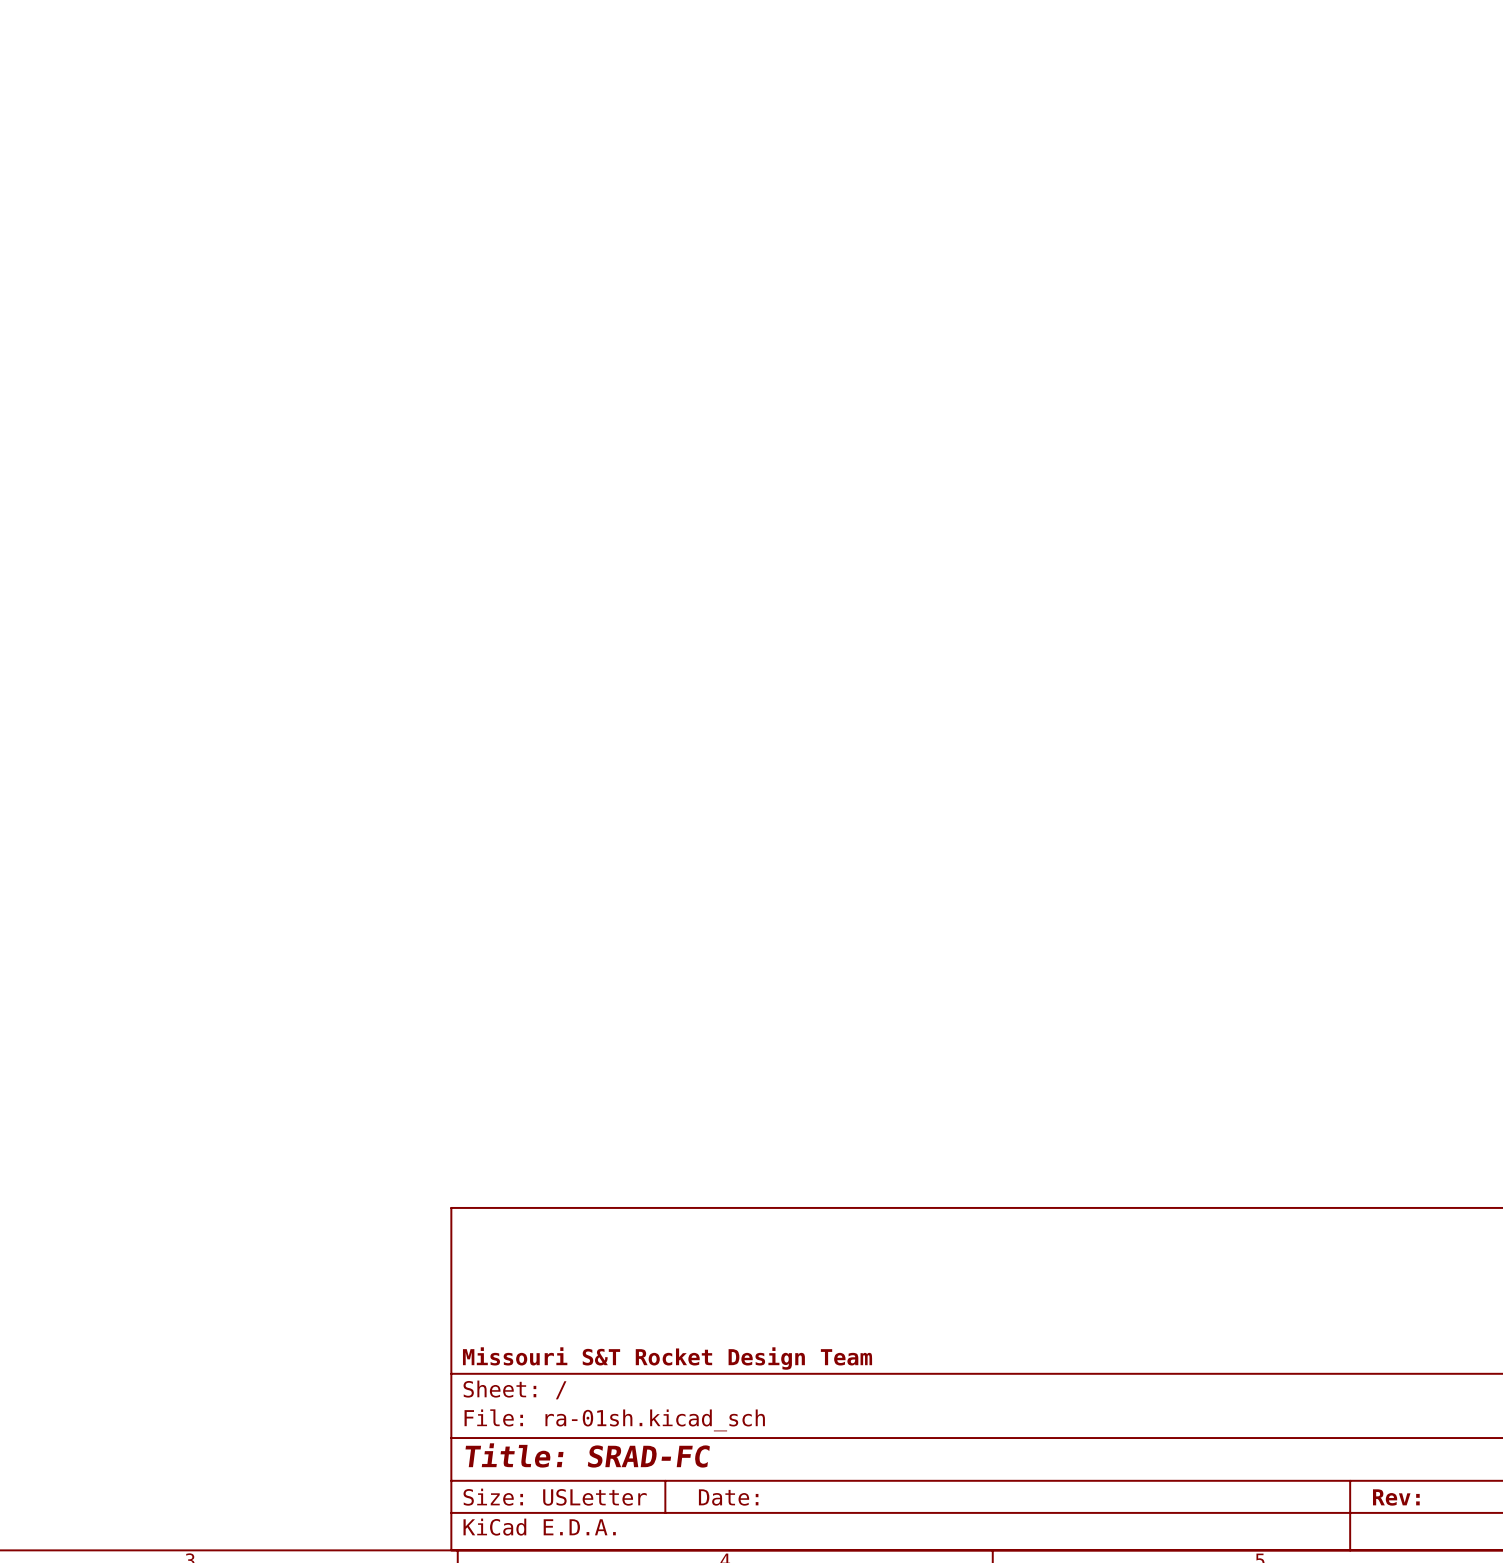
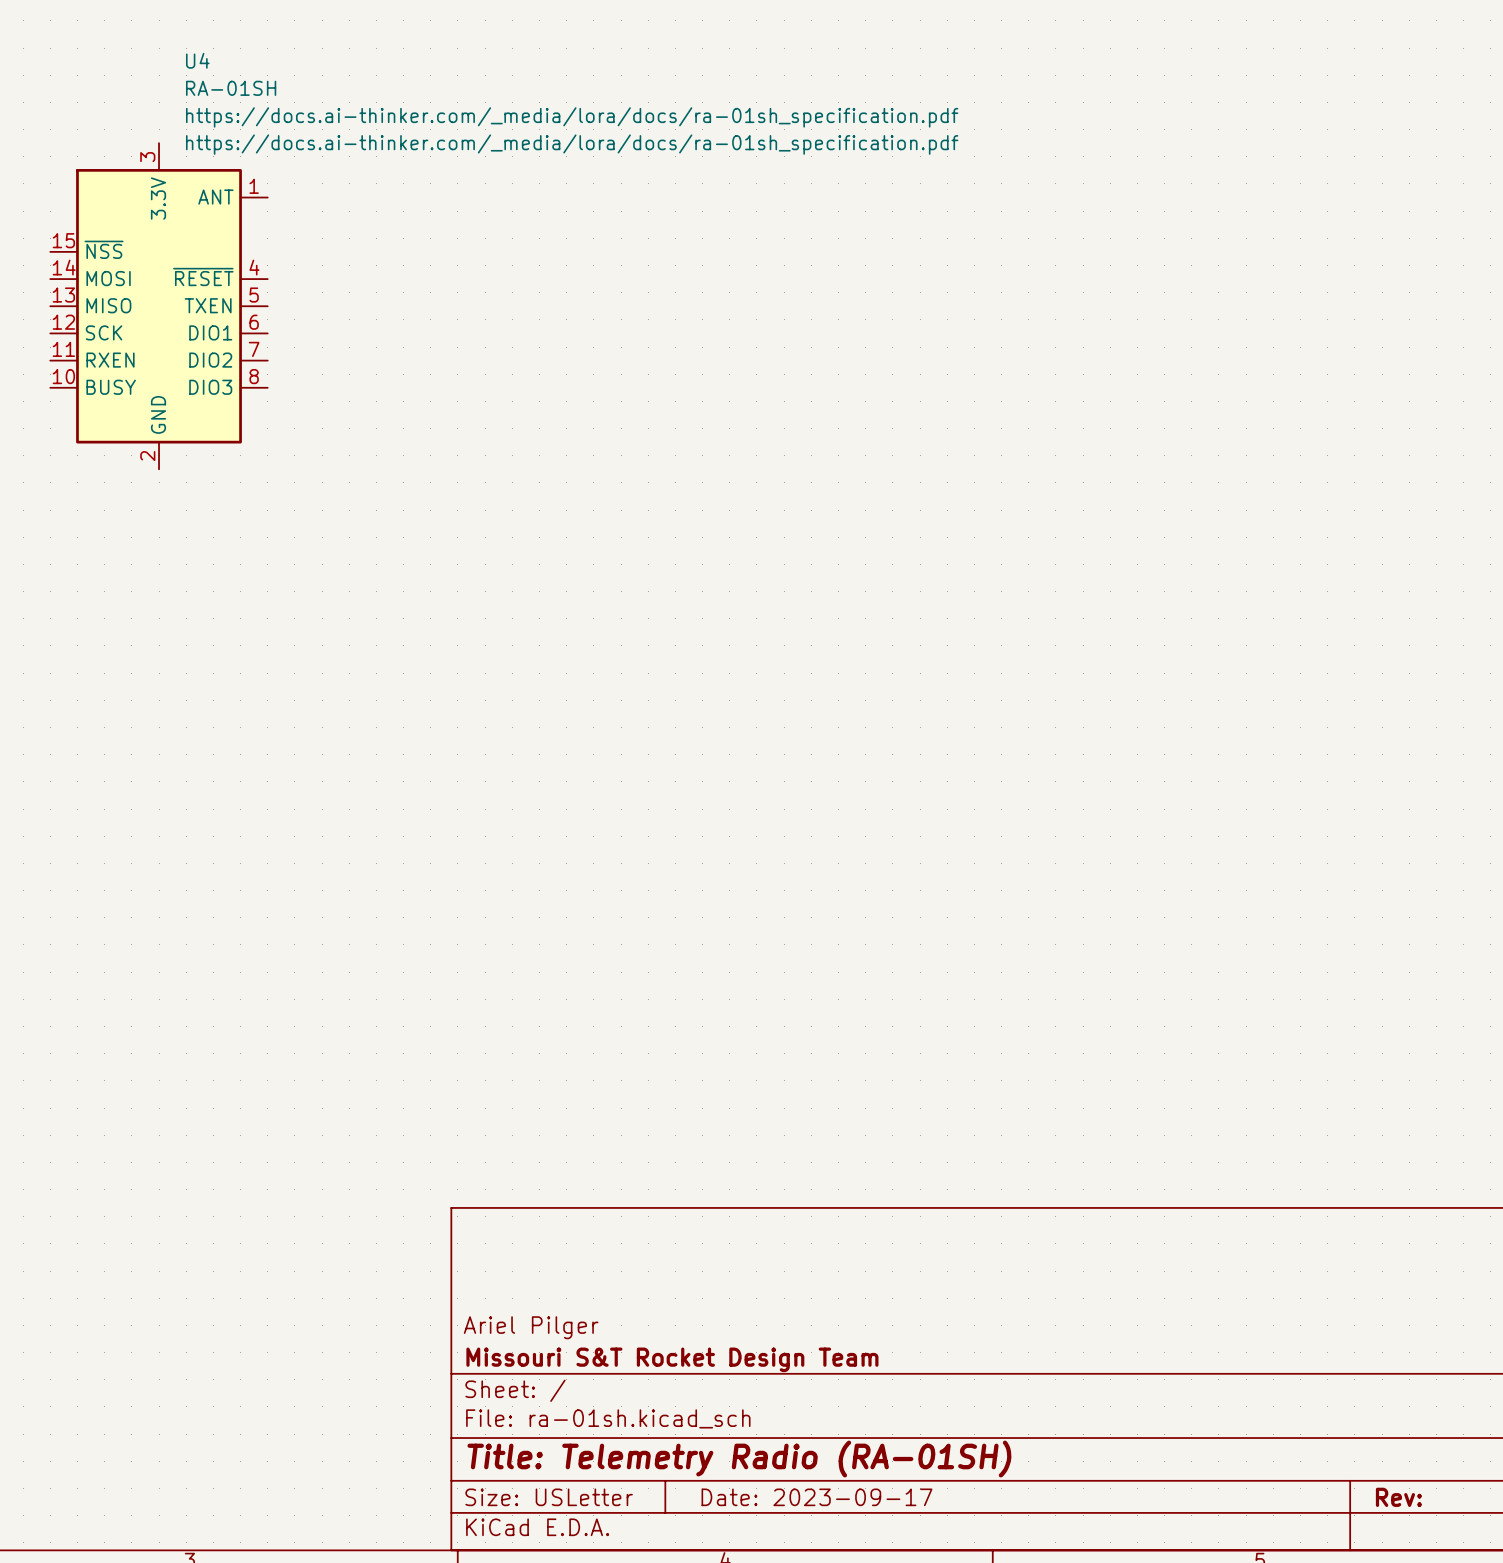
U4: none -> RA-01SH (159, 306)
title block: none -> Ariel Pilger (531, 1327)
title block: Title: SRAD-FC (587, 1455) -> Title: Telemetry Radio (RA-01SH) (739, 1459)
title block: Date: (728, 1497) -> Date: 2023-09-17 (816, 1497)

